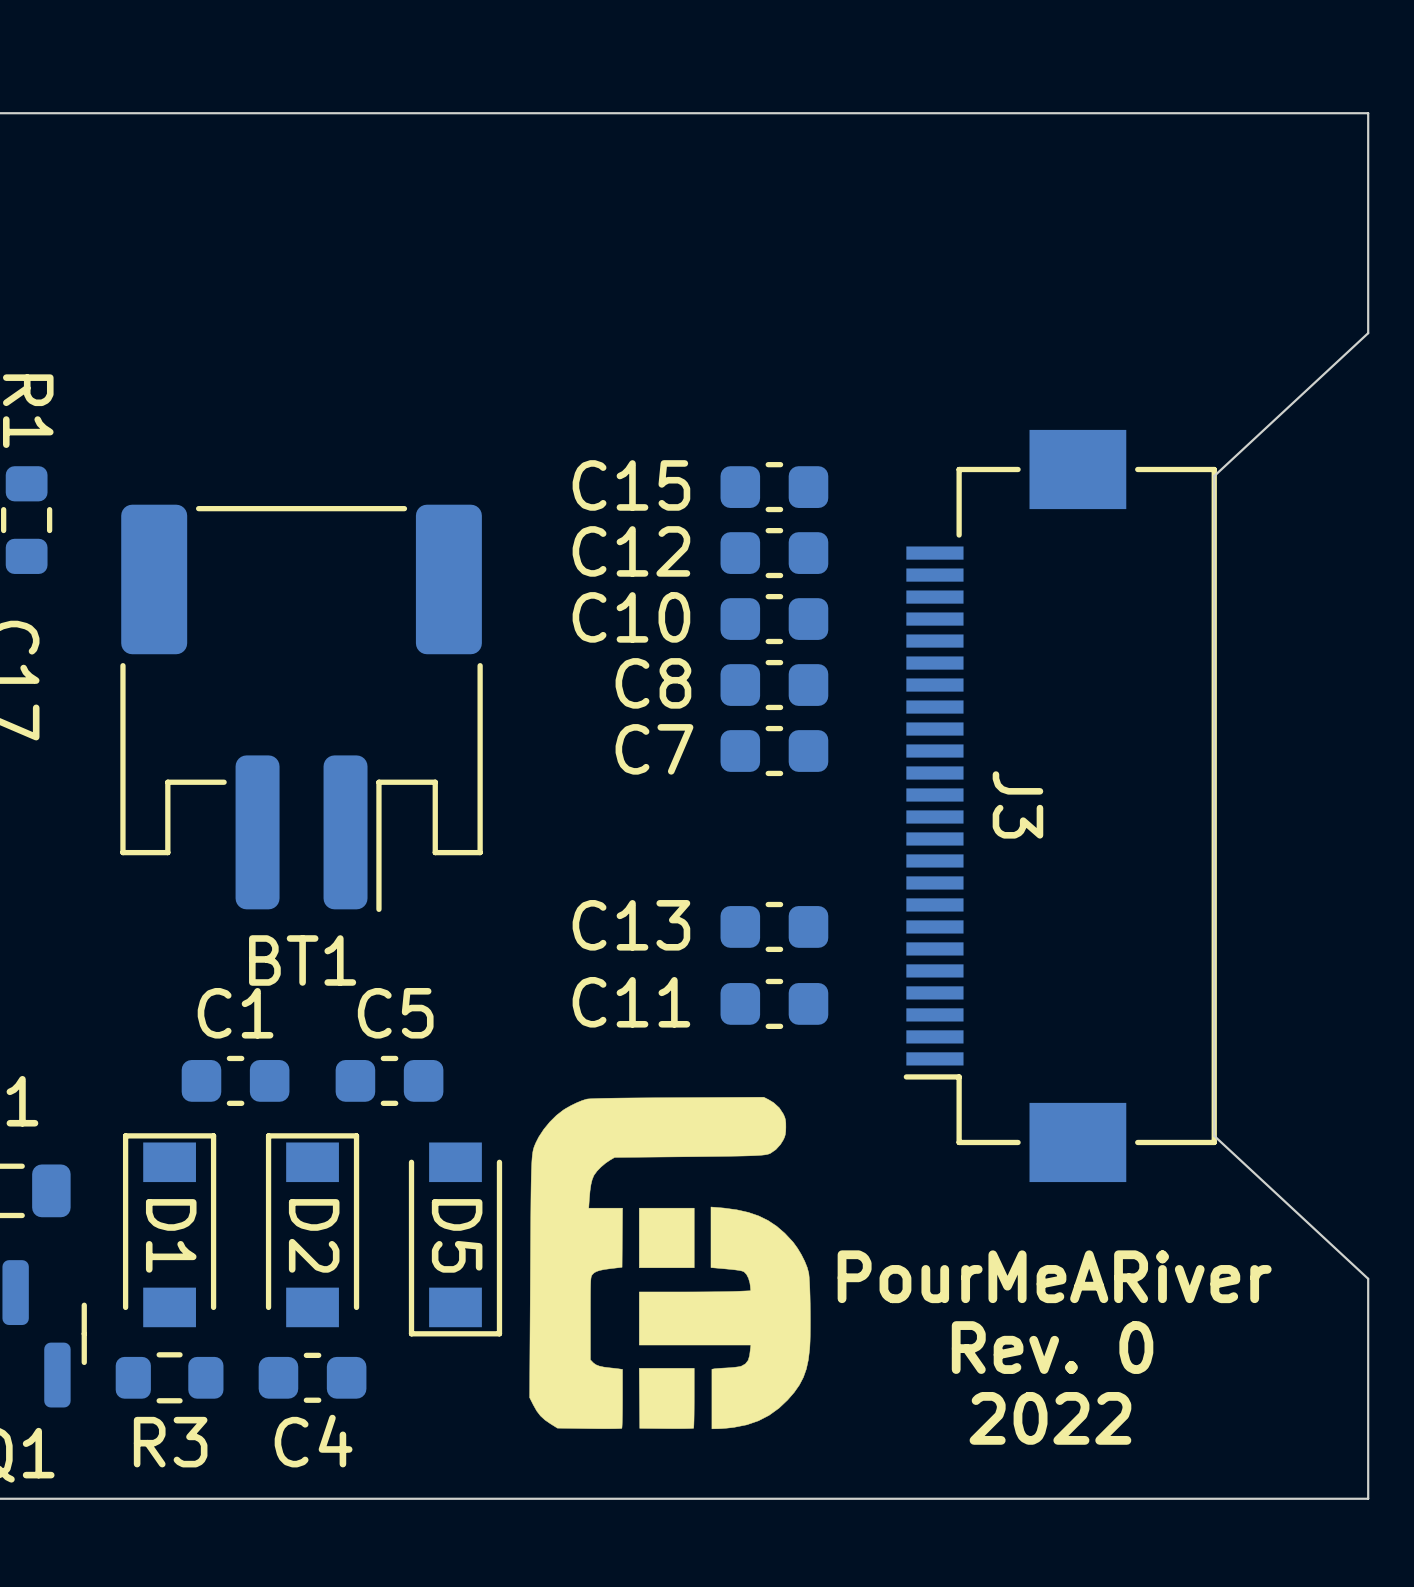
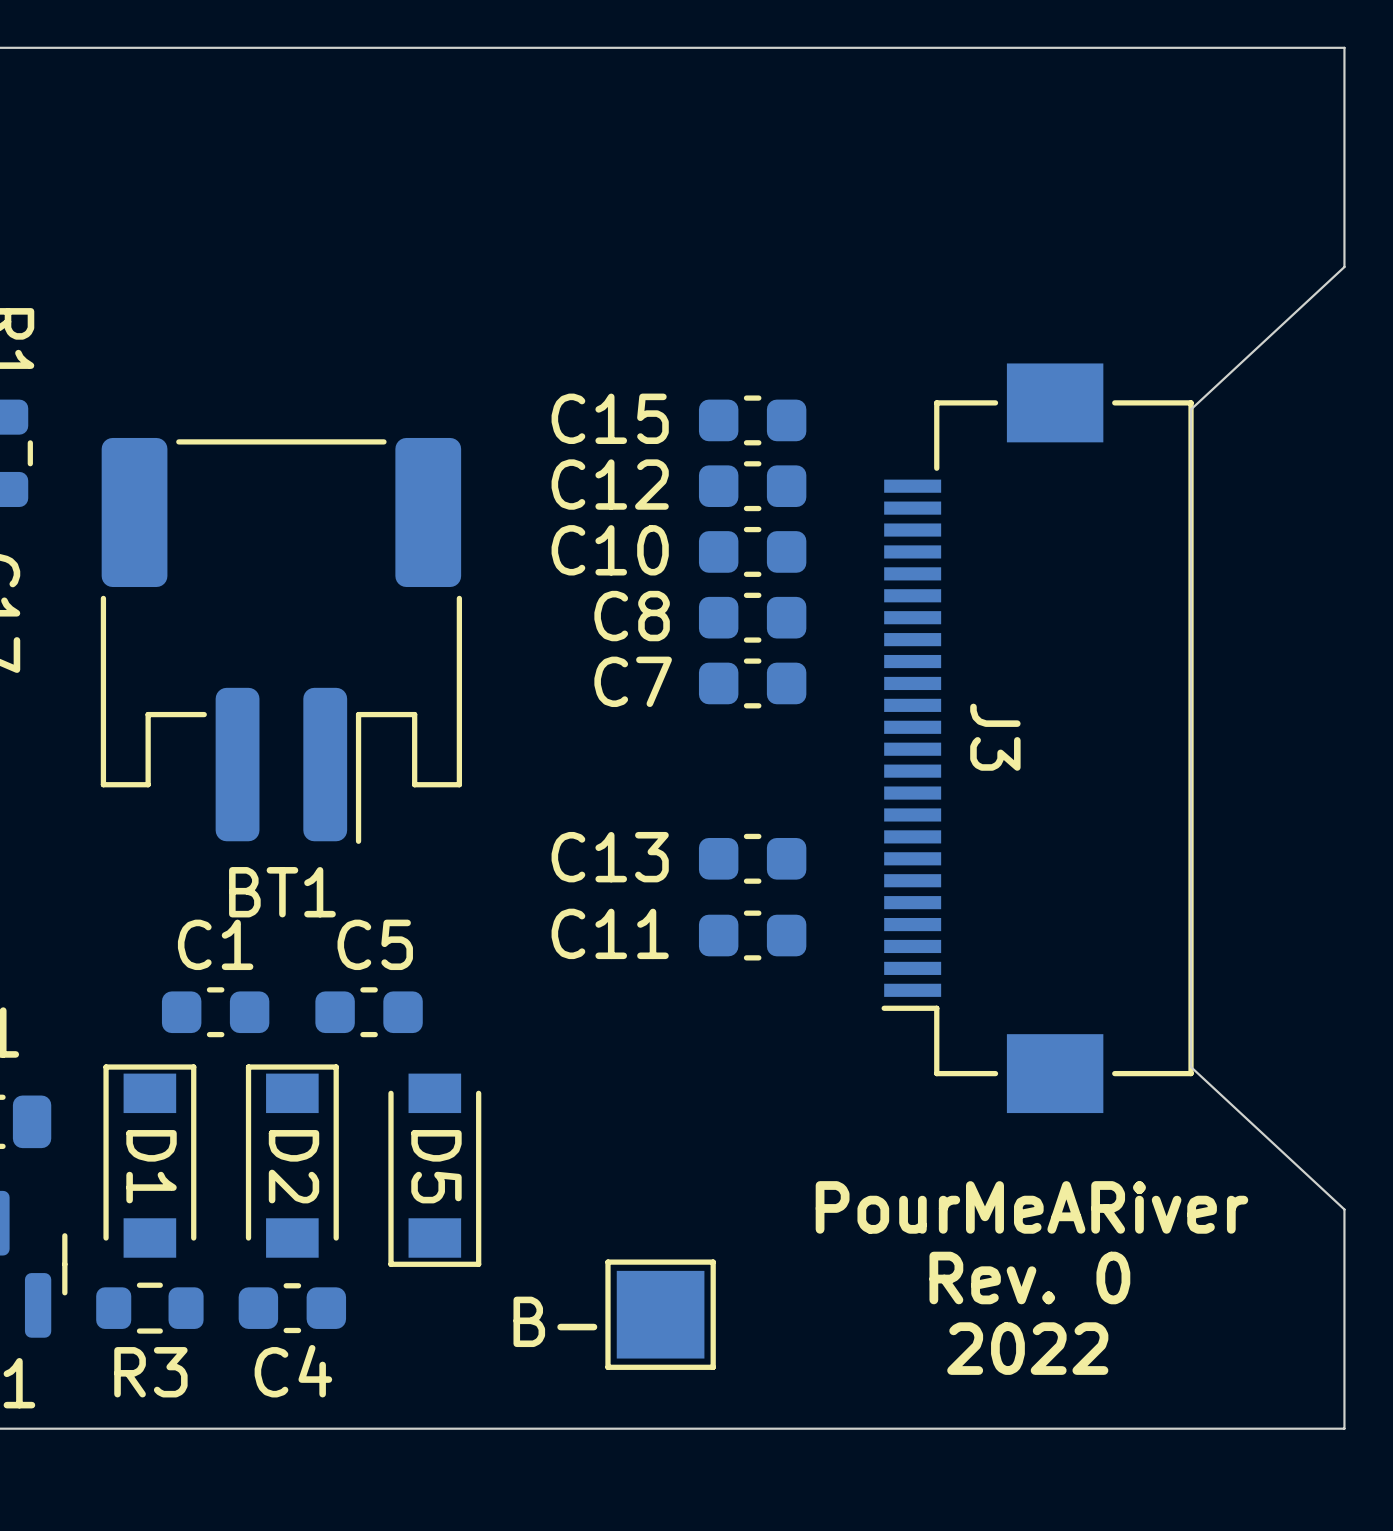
drawing: [529, 1097, 811, 1430] -> none
part: none -> (660, 1314)
text: none -> B- (555, 1321)

